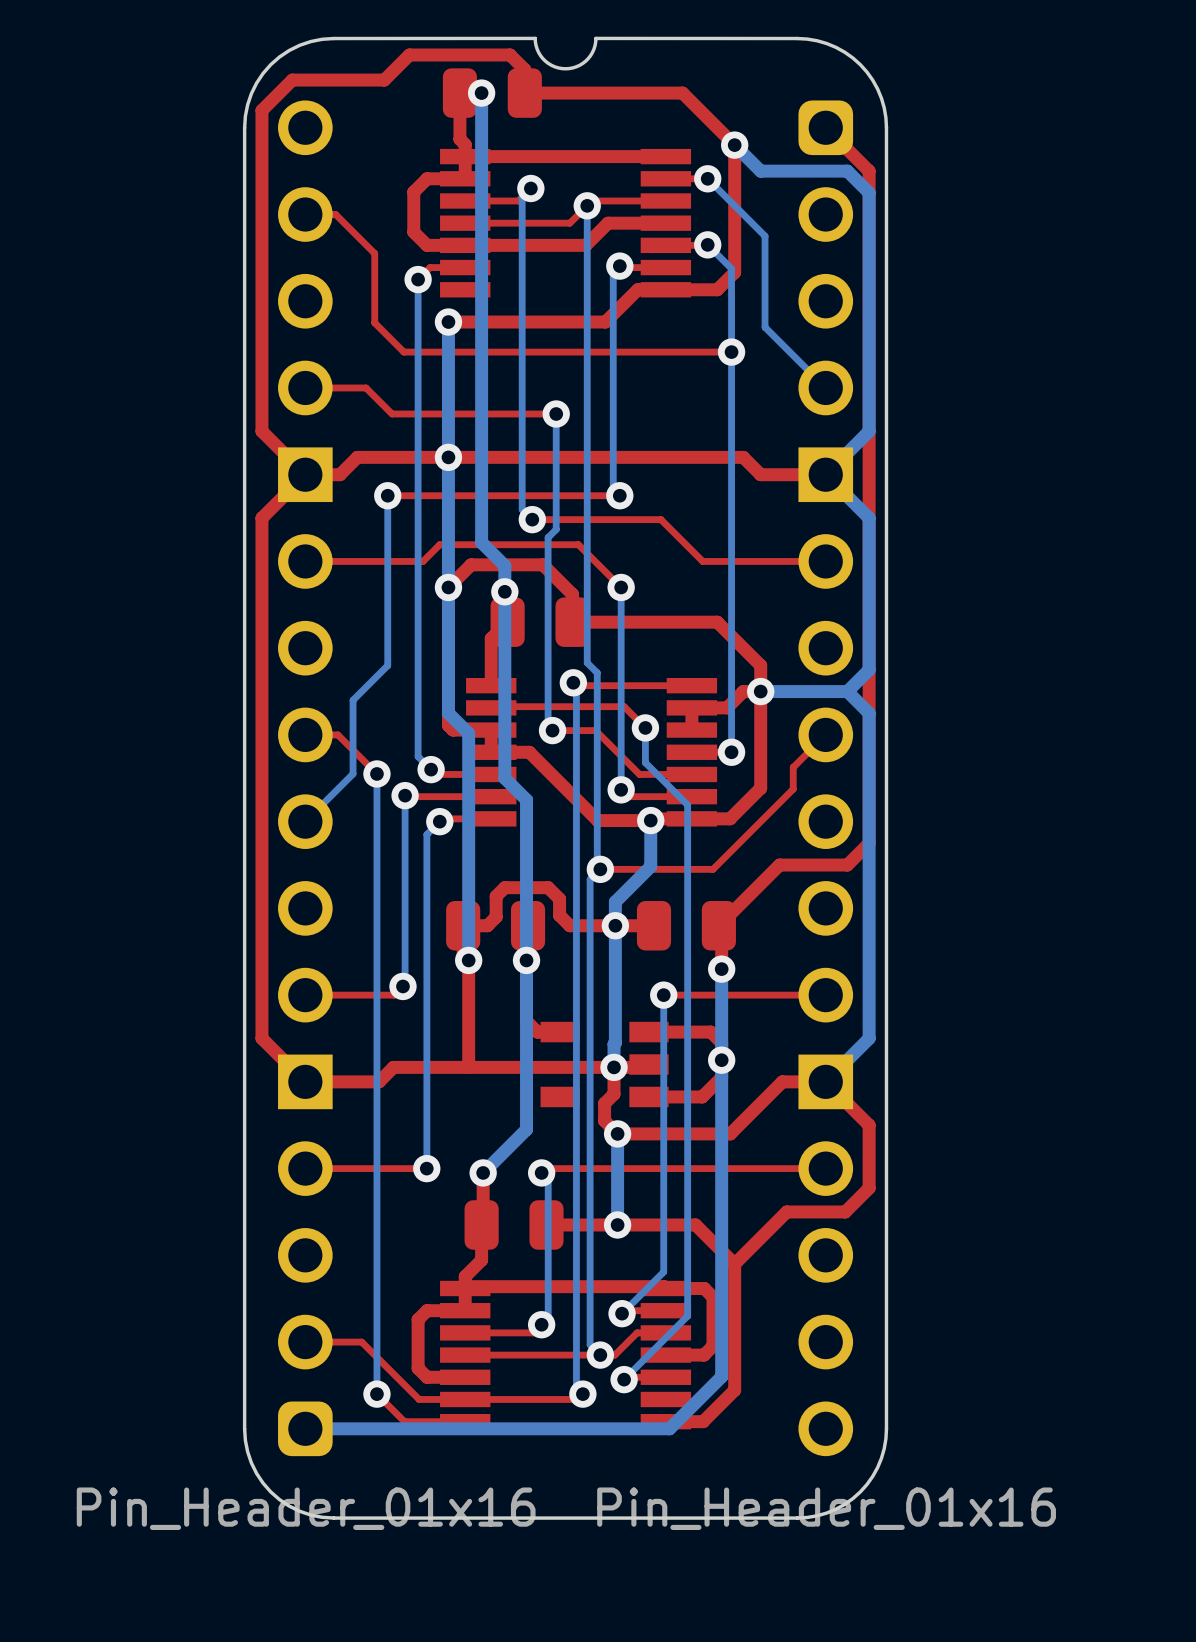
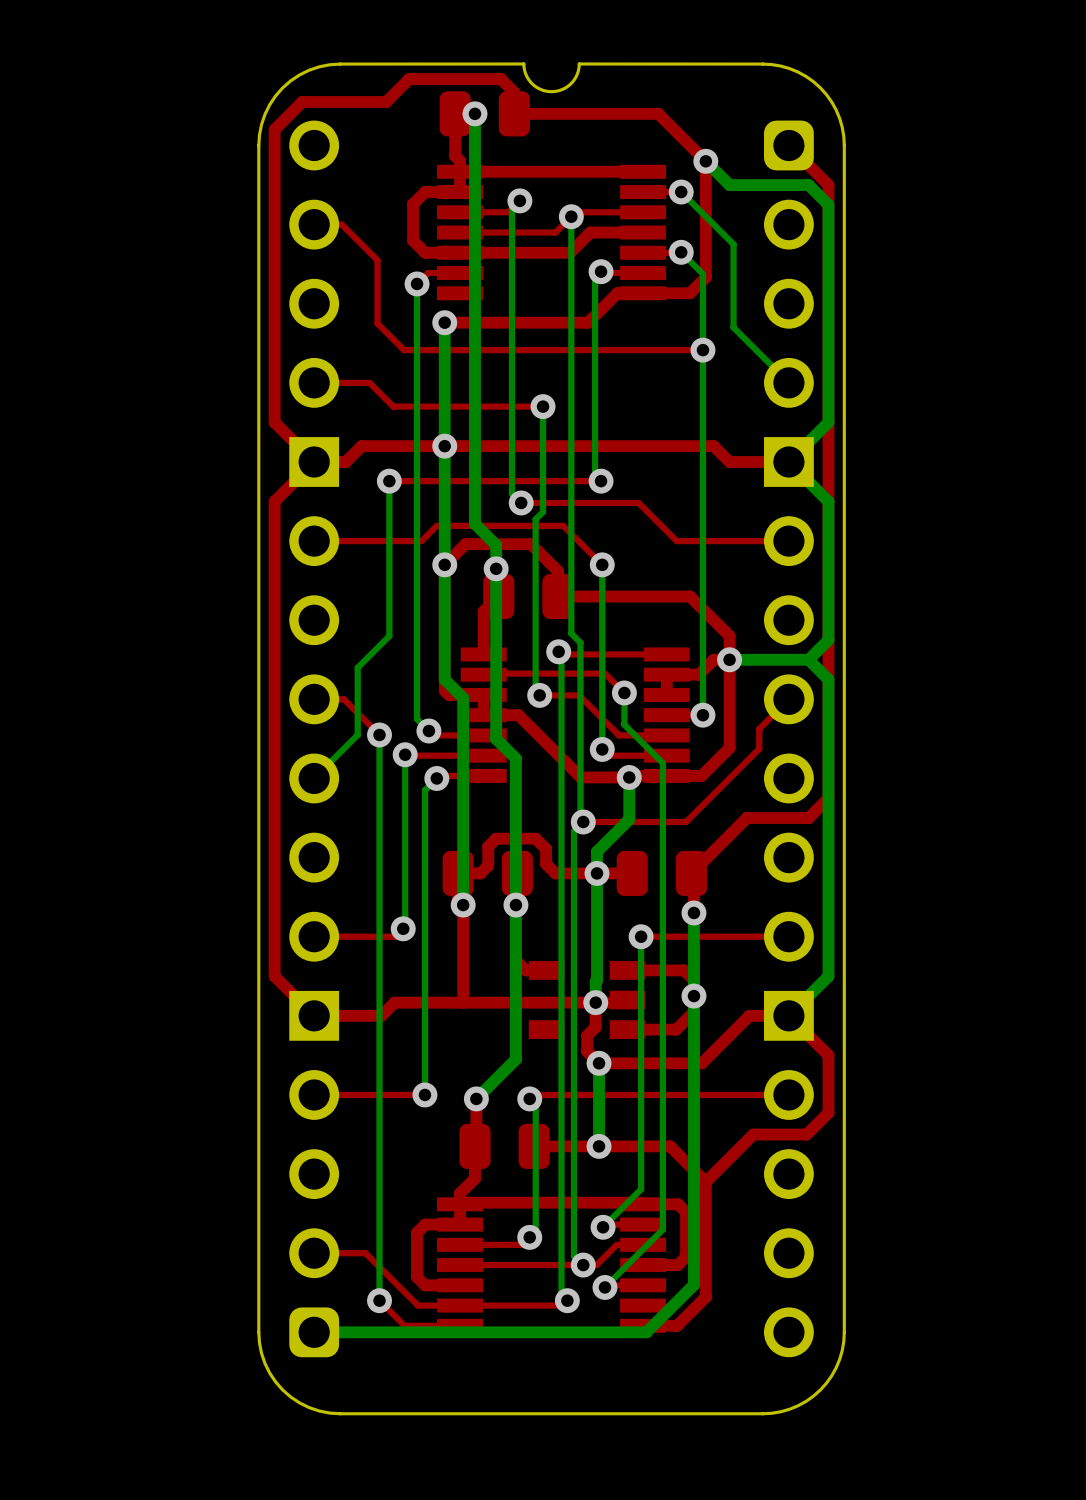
drawing: [76, 1487, 1056, 1530] -> none

